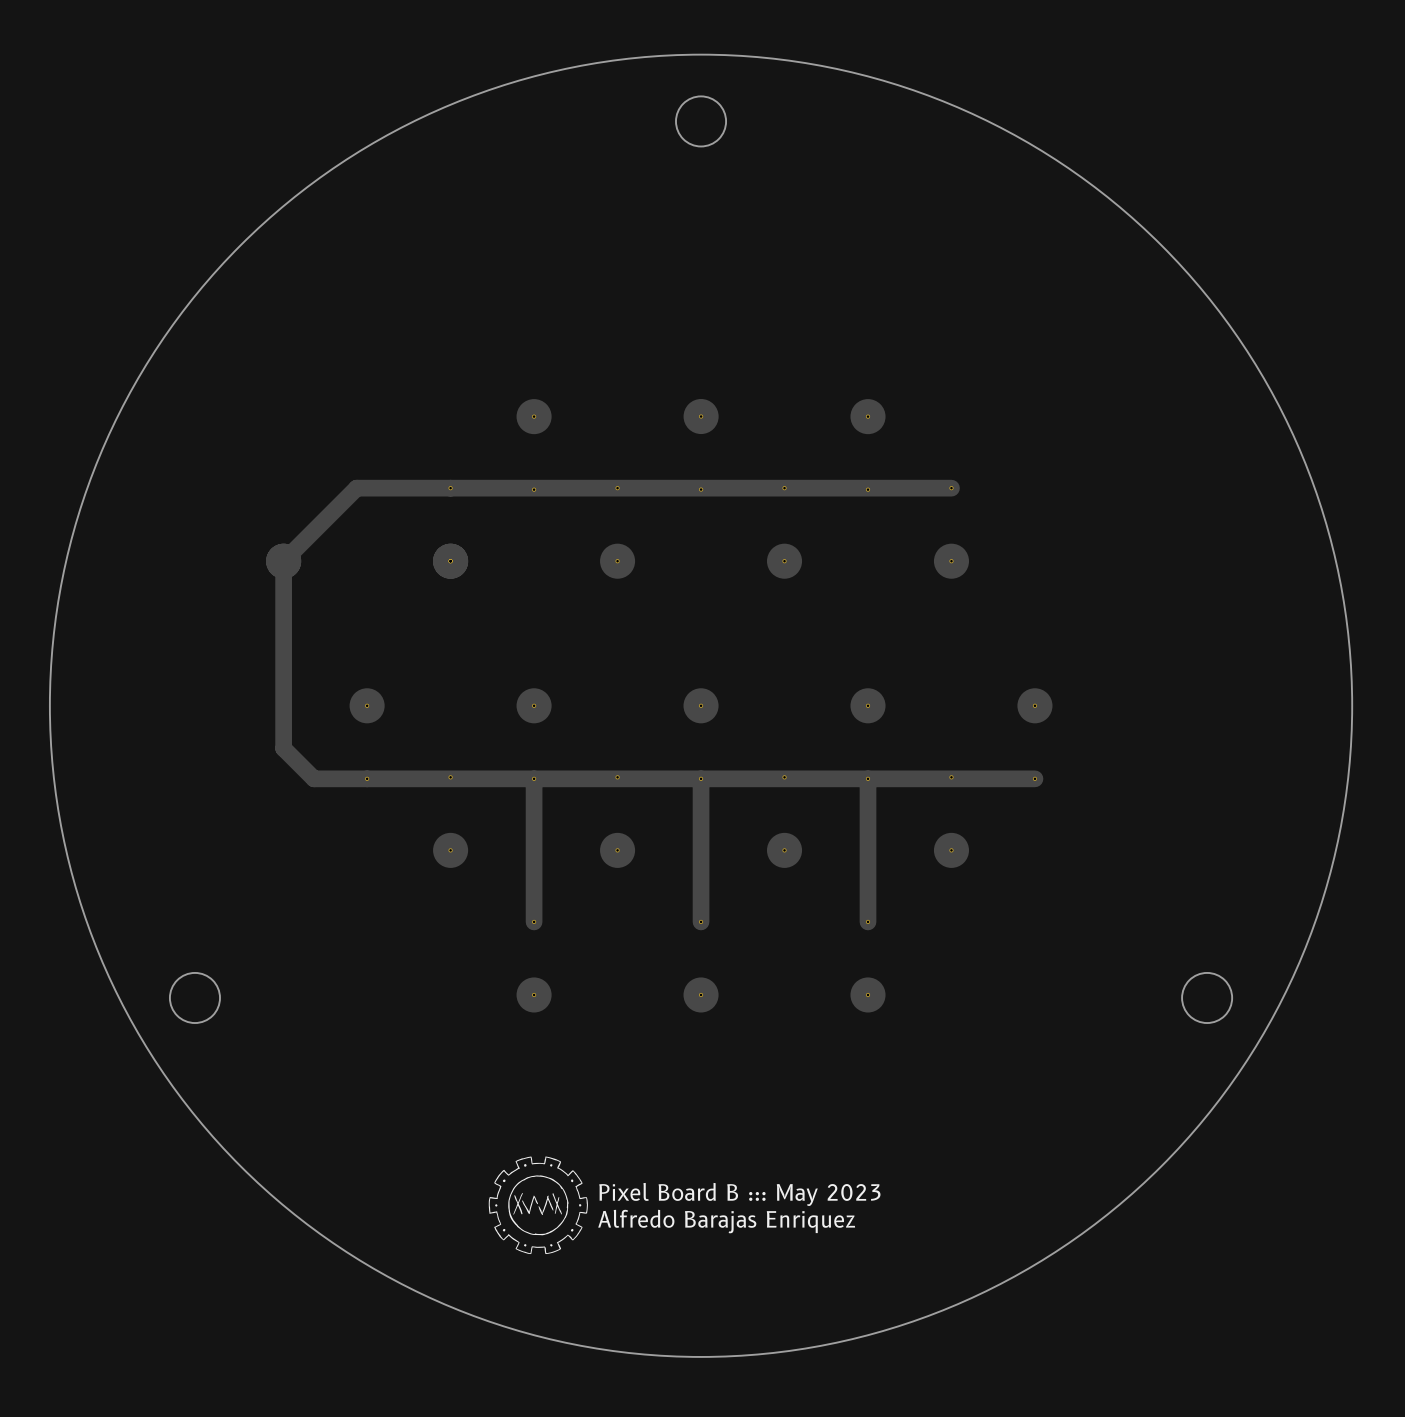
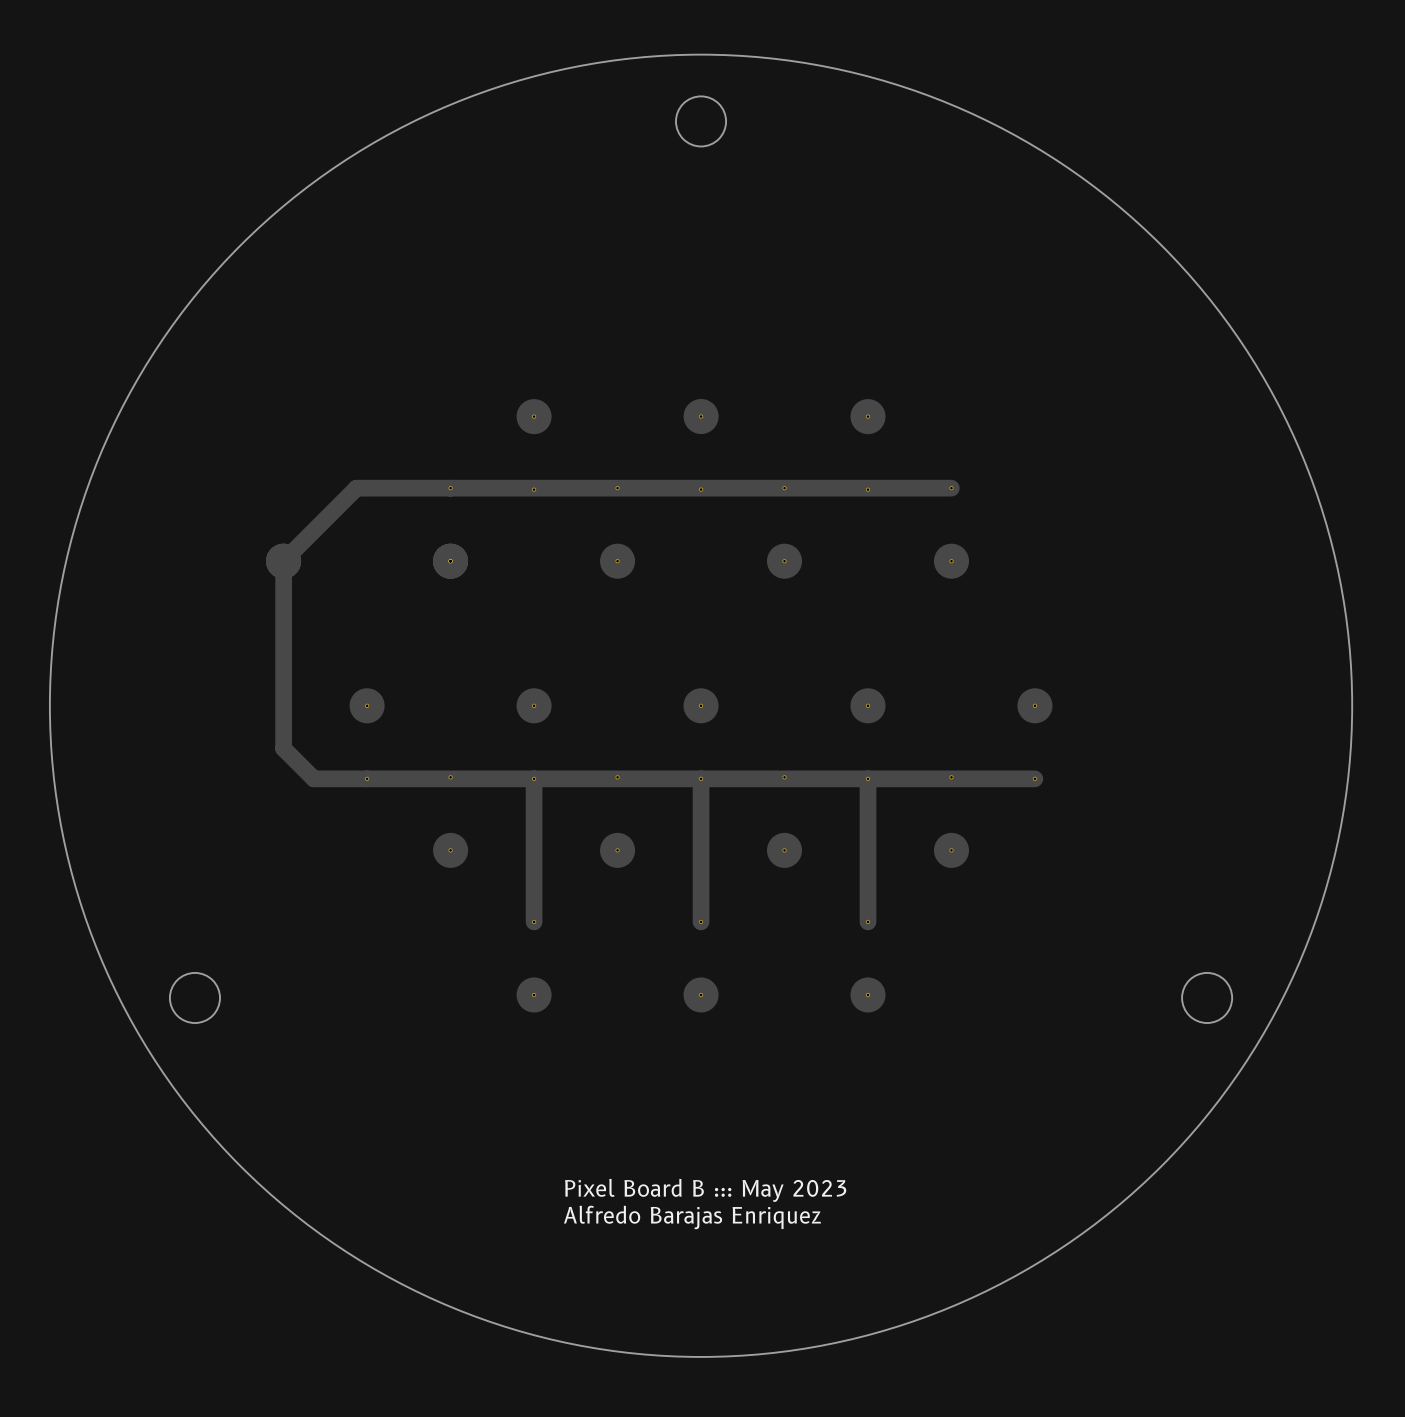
drawing: [488, 1156, 588, 1255] -> none
text position: Pixel Board B ::: May 2023 (739, 1194) -> Pixel Board B ::: May 2023 (705, 1190)
text position: Alfredo Barajas Enriquez (726, 1221) -> Alfredo Barajas Enriquez (692, 1217)

